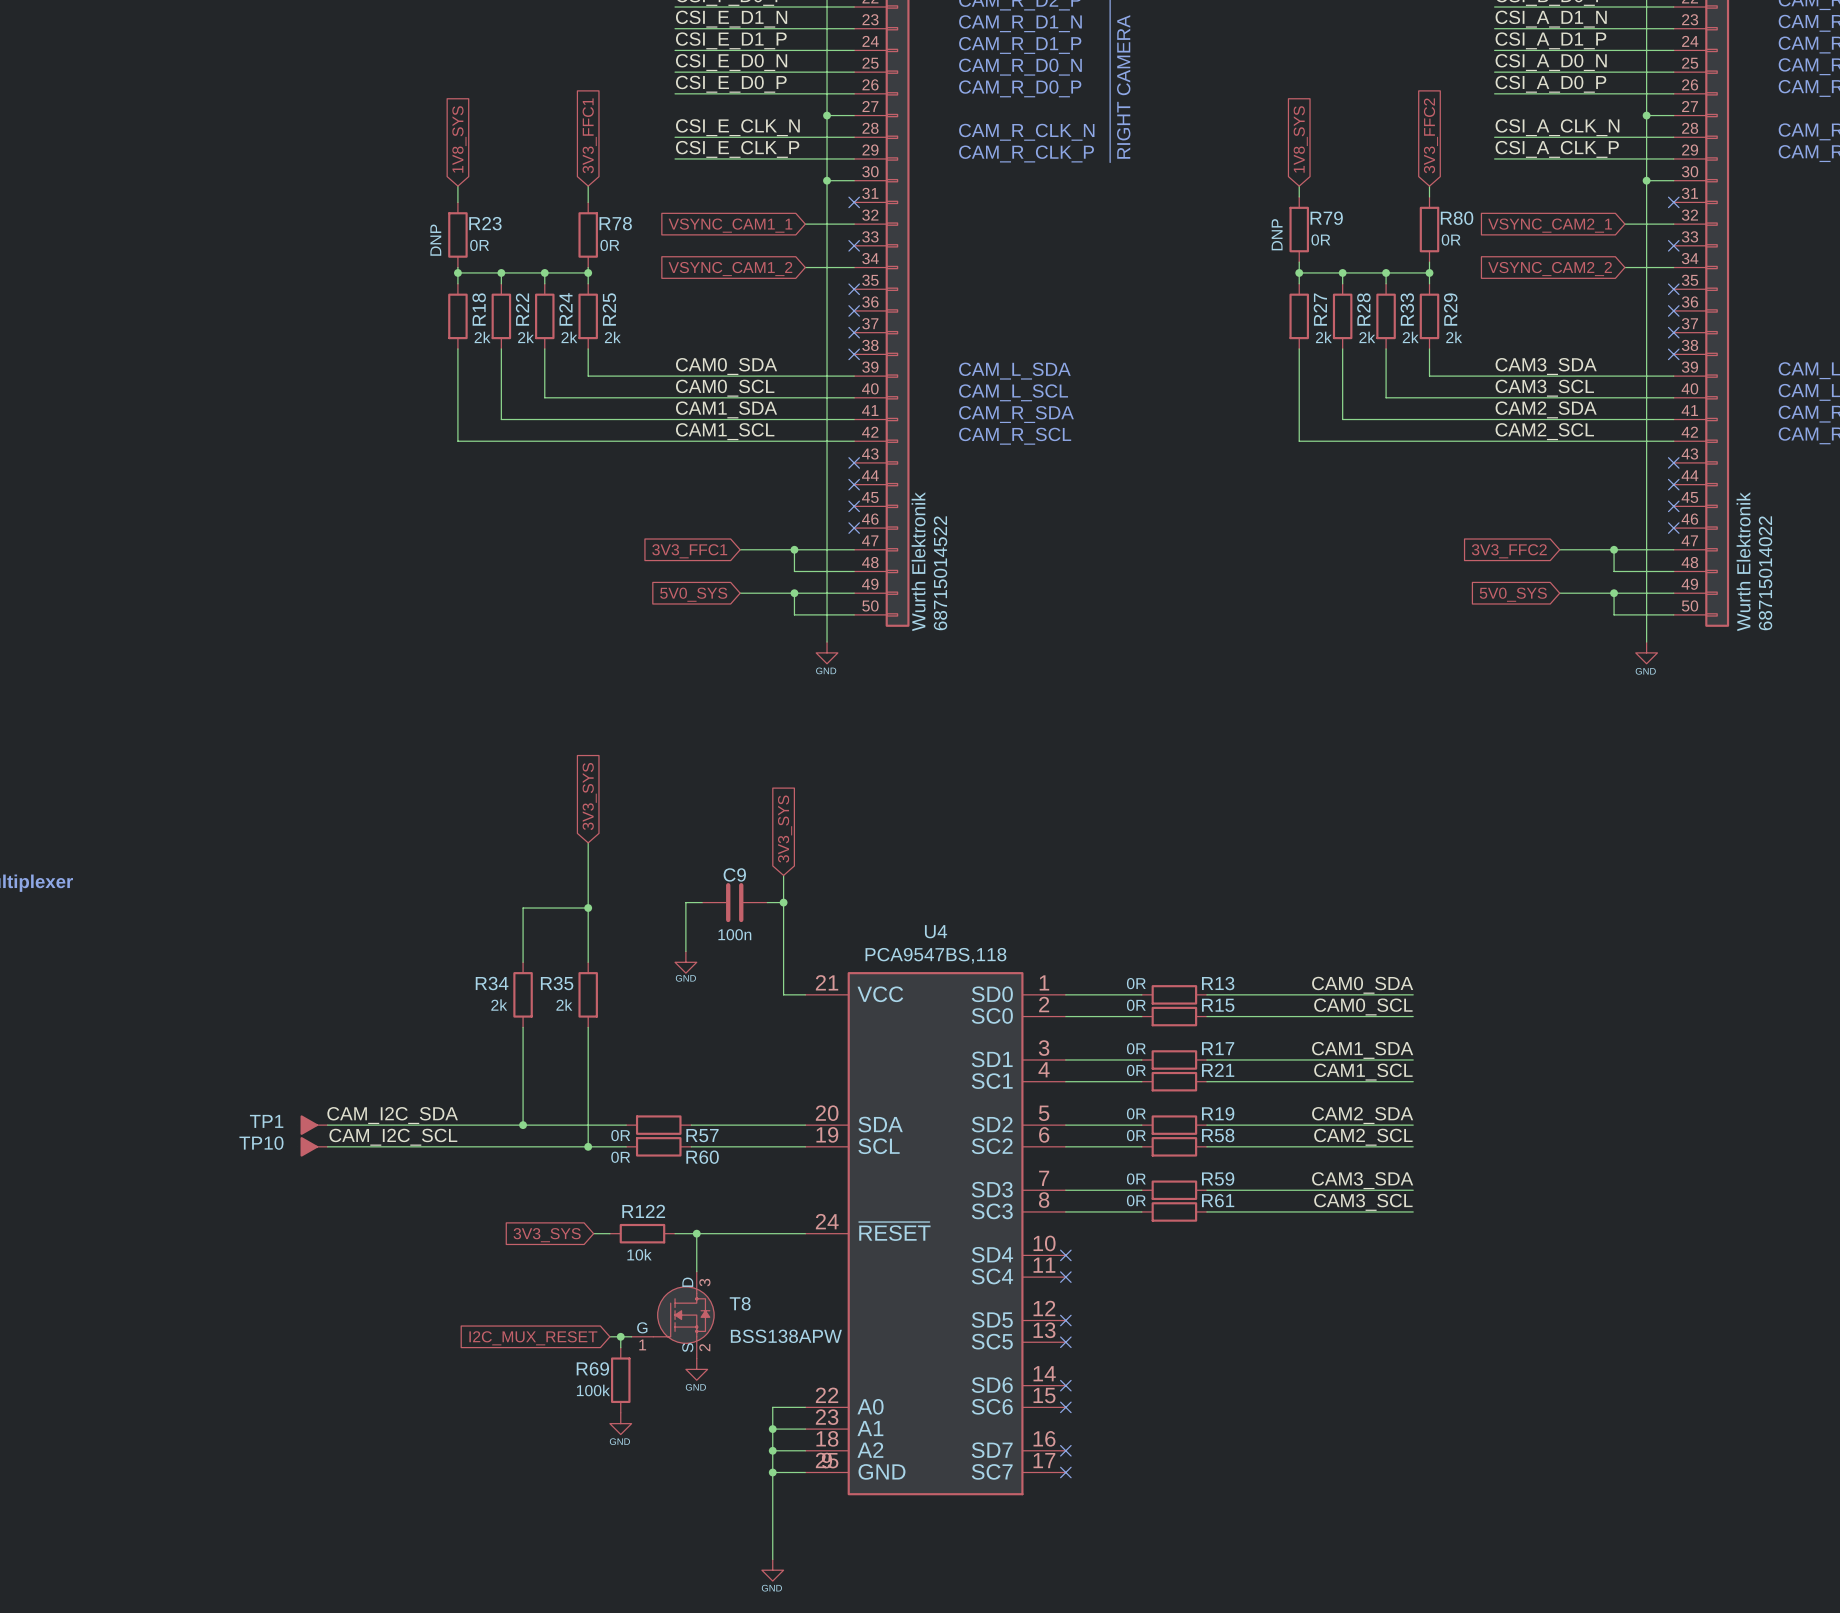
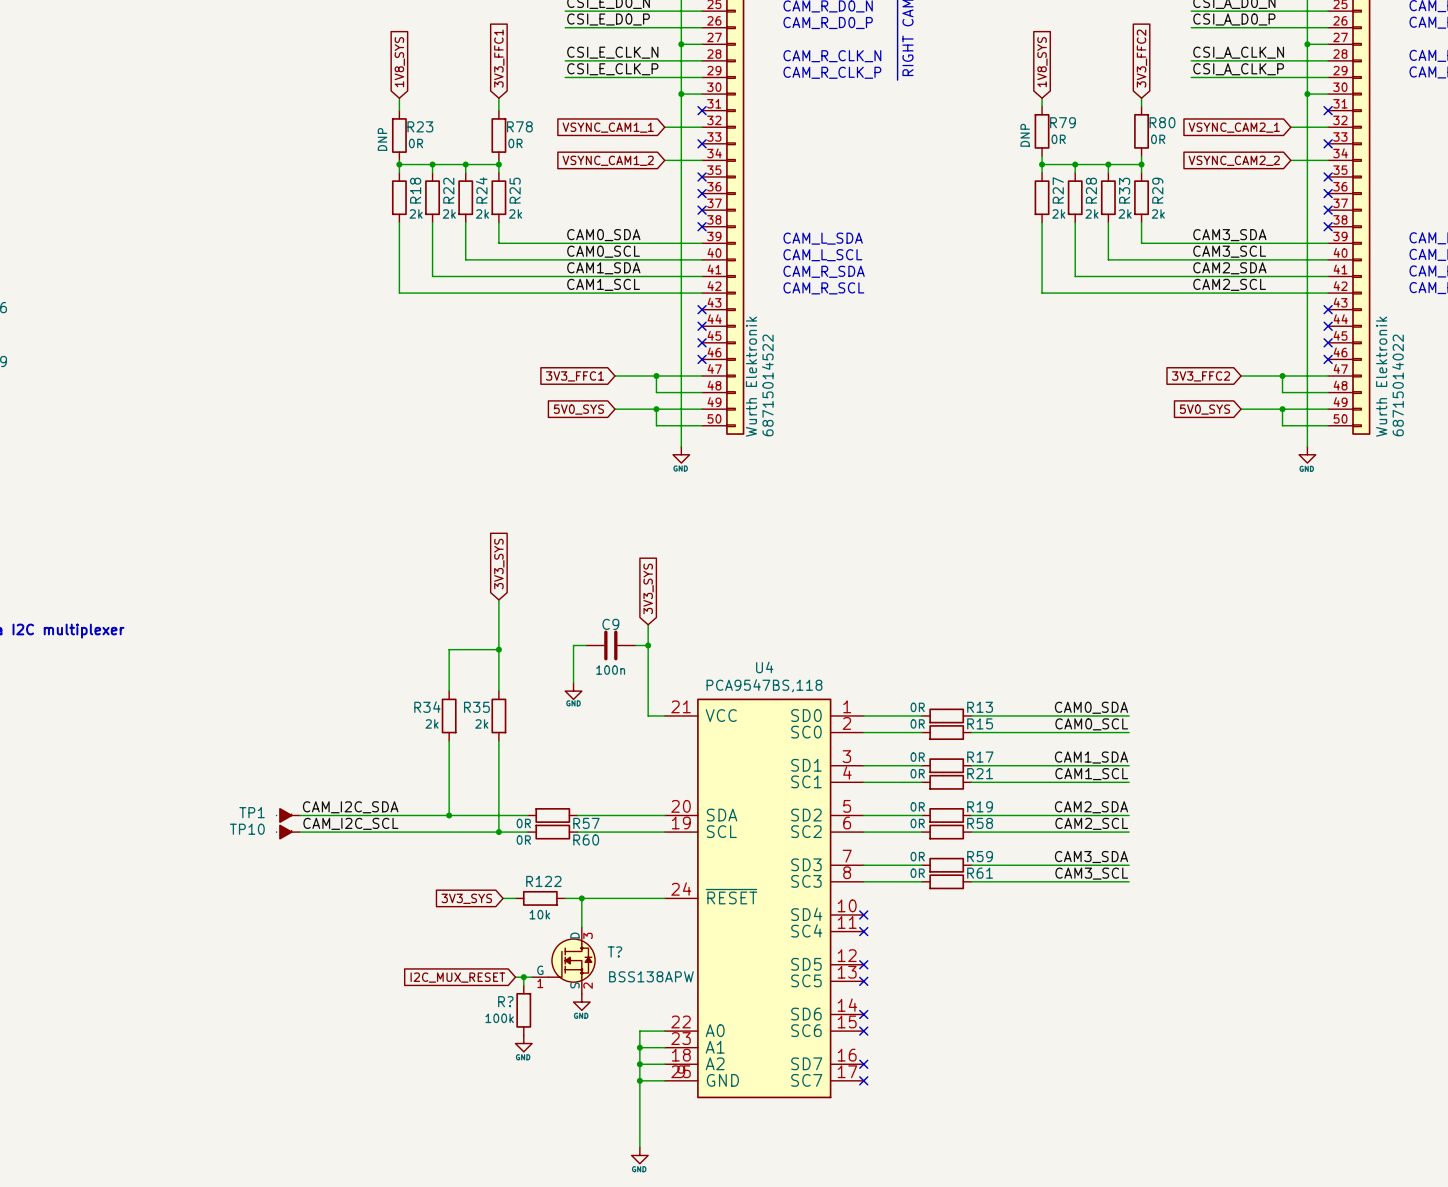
T8 name: T8 (740, 1303) -> T? (614, 951)
R69 name: R69 (592, 1368) -> R? (505, 1001)

